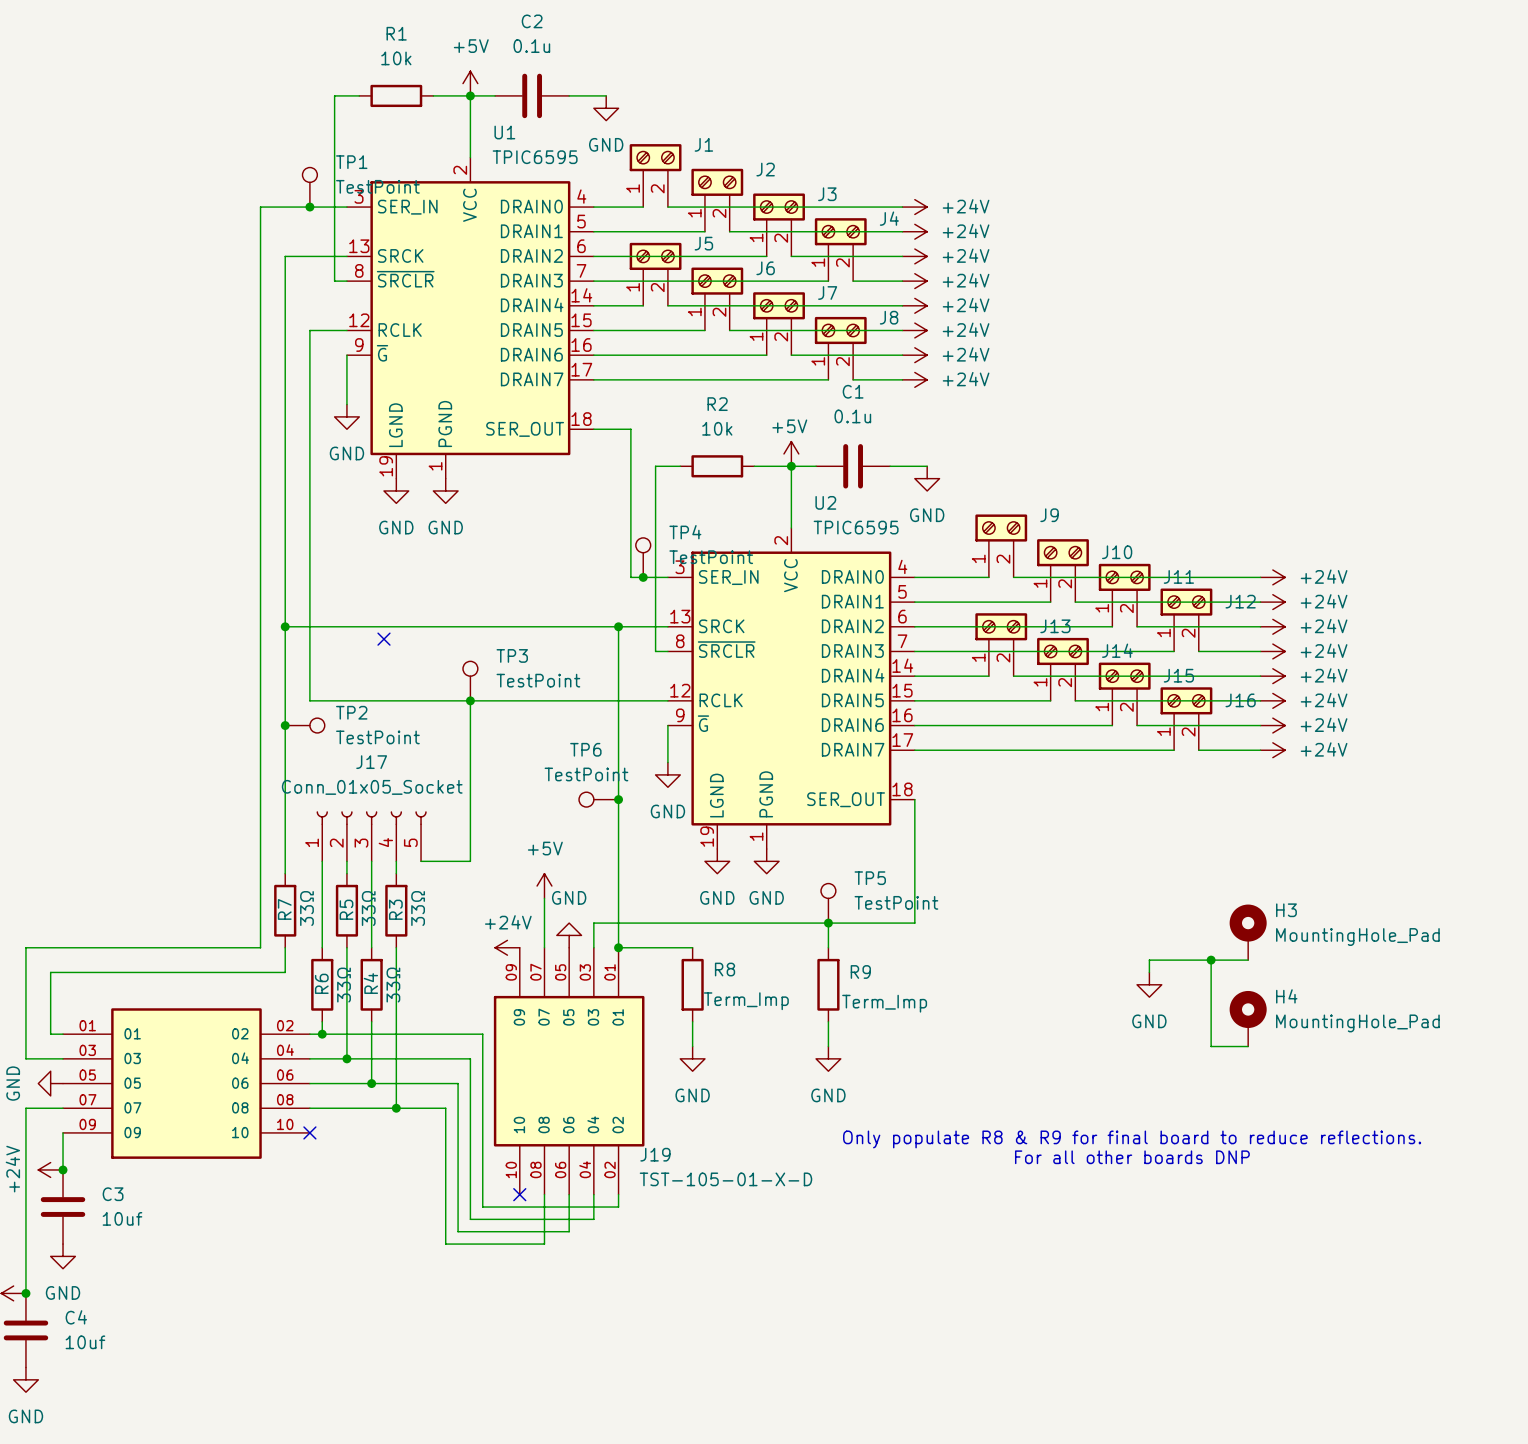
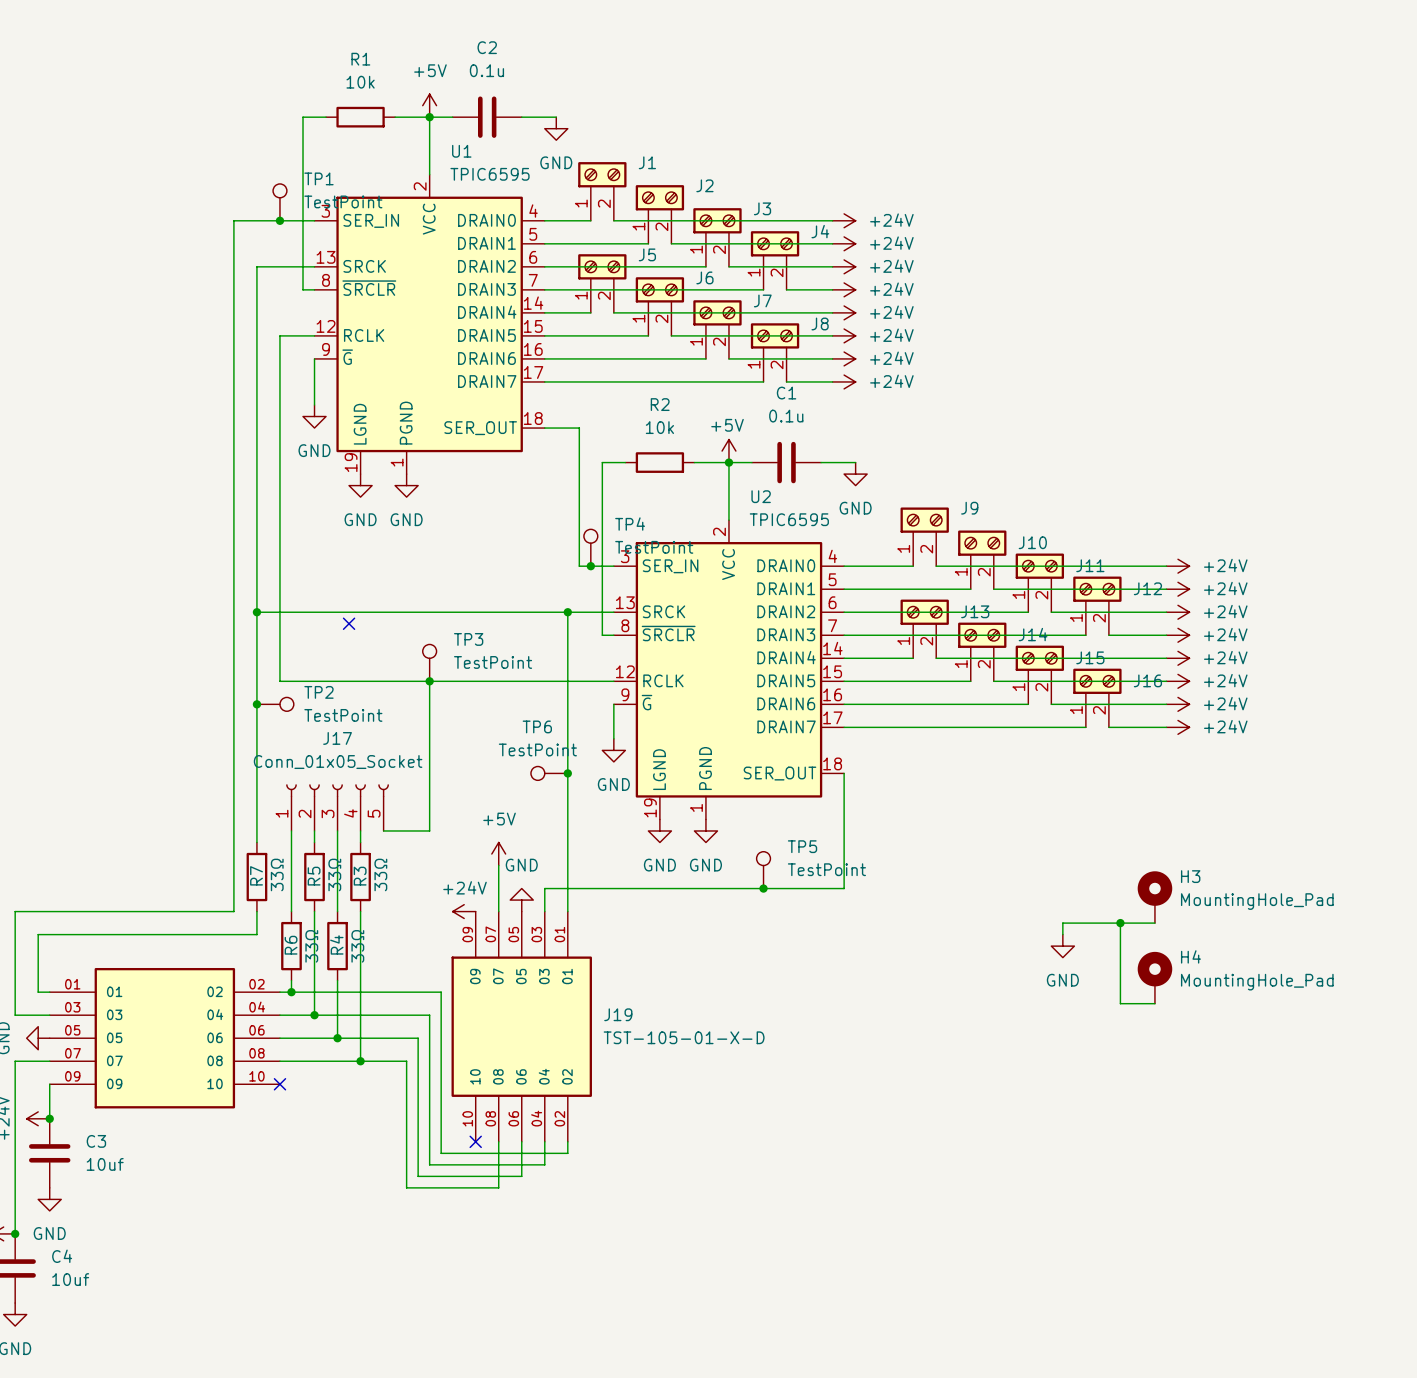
wire: (828, 923) (828, 947) -> none
wire: (618, 947) (692, 947) -> none
junction: (618, 947) -> none
R8: Term_Imp (692, 984) -> none
R9: Term_Imp (828, 984) -> none
wire: (692, 1021) (692, 1046) -> none
wire: (828, 1021) (828, 1046) -> none
power symbol: GND (692, 1058) -> none
power symbol: GND (828, 1058) -> none
text: Only populate R8 & R9 for final board to reduce reflections. (1132, 1139) -> none
J19 name position: J19 (655, 1154) -> J19 (618, 1014)
text: For all other boards DNP (1132, 1157) -> none
J19 value position: TST-105-01-X-D (725, 1179) -> TST-105-01-X-D (684, 1037)

